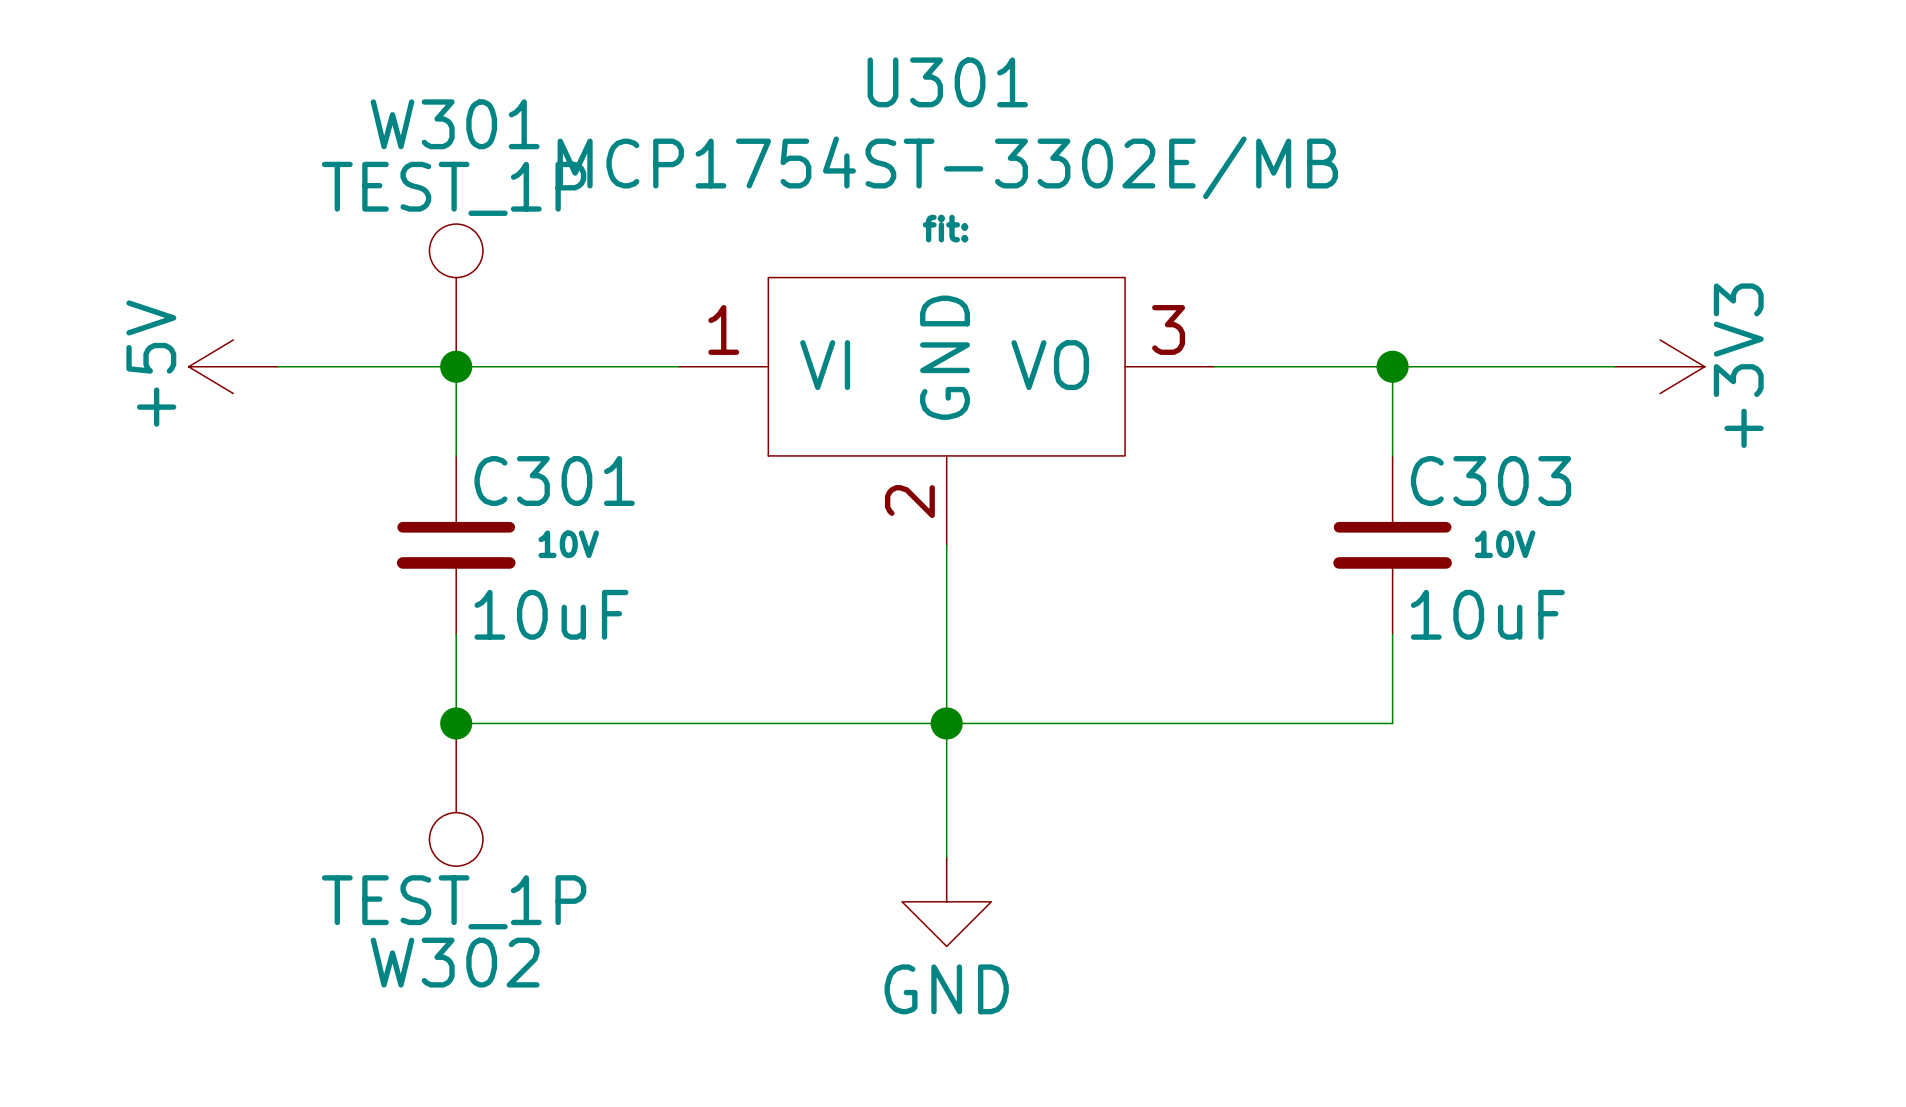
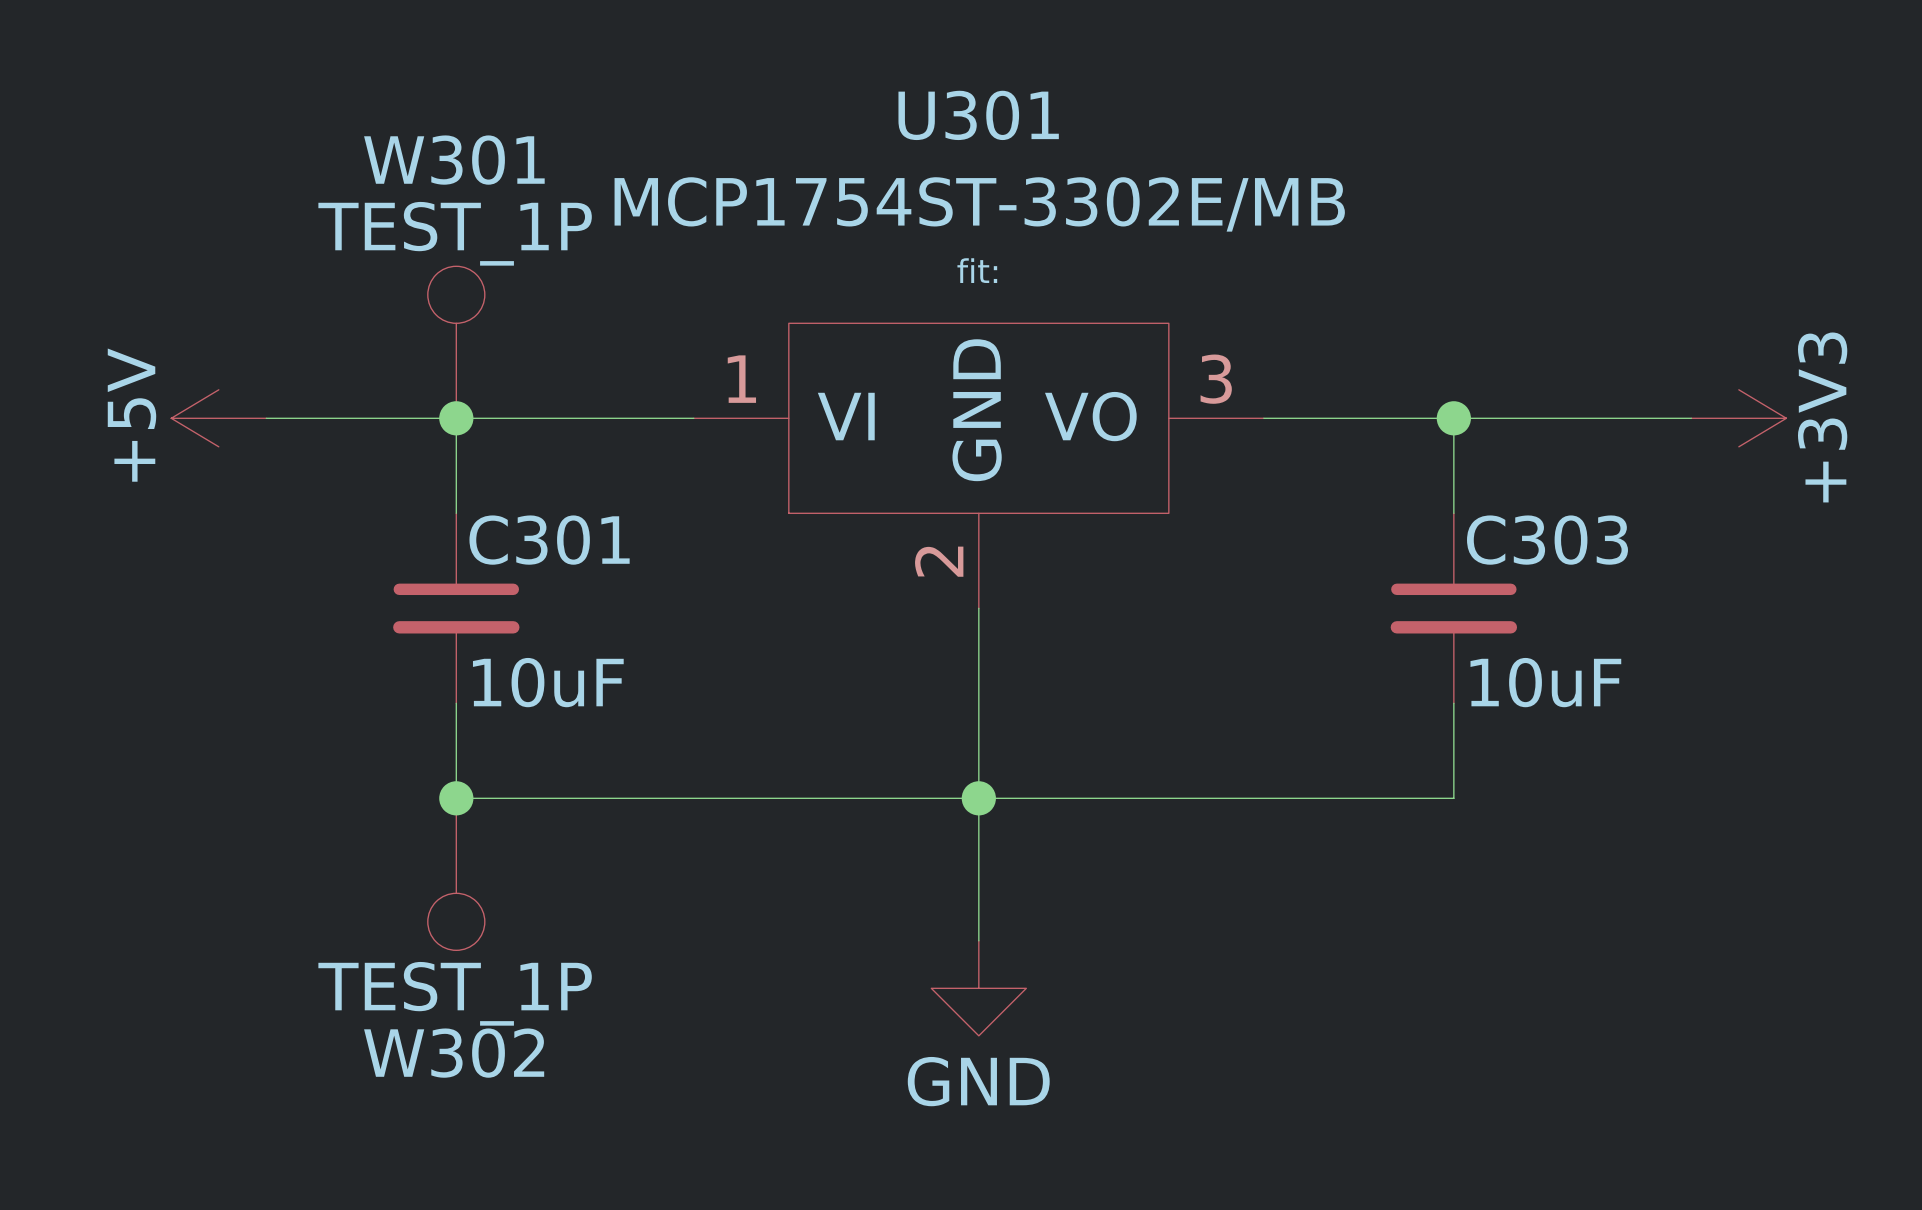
C301 text: 10V (568, 544) -> none
C303 text: 10V (1505, 544) -> none

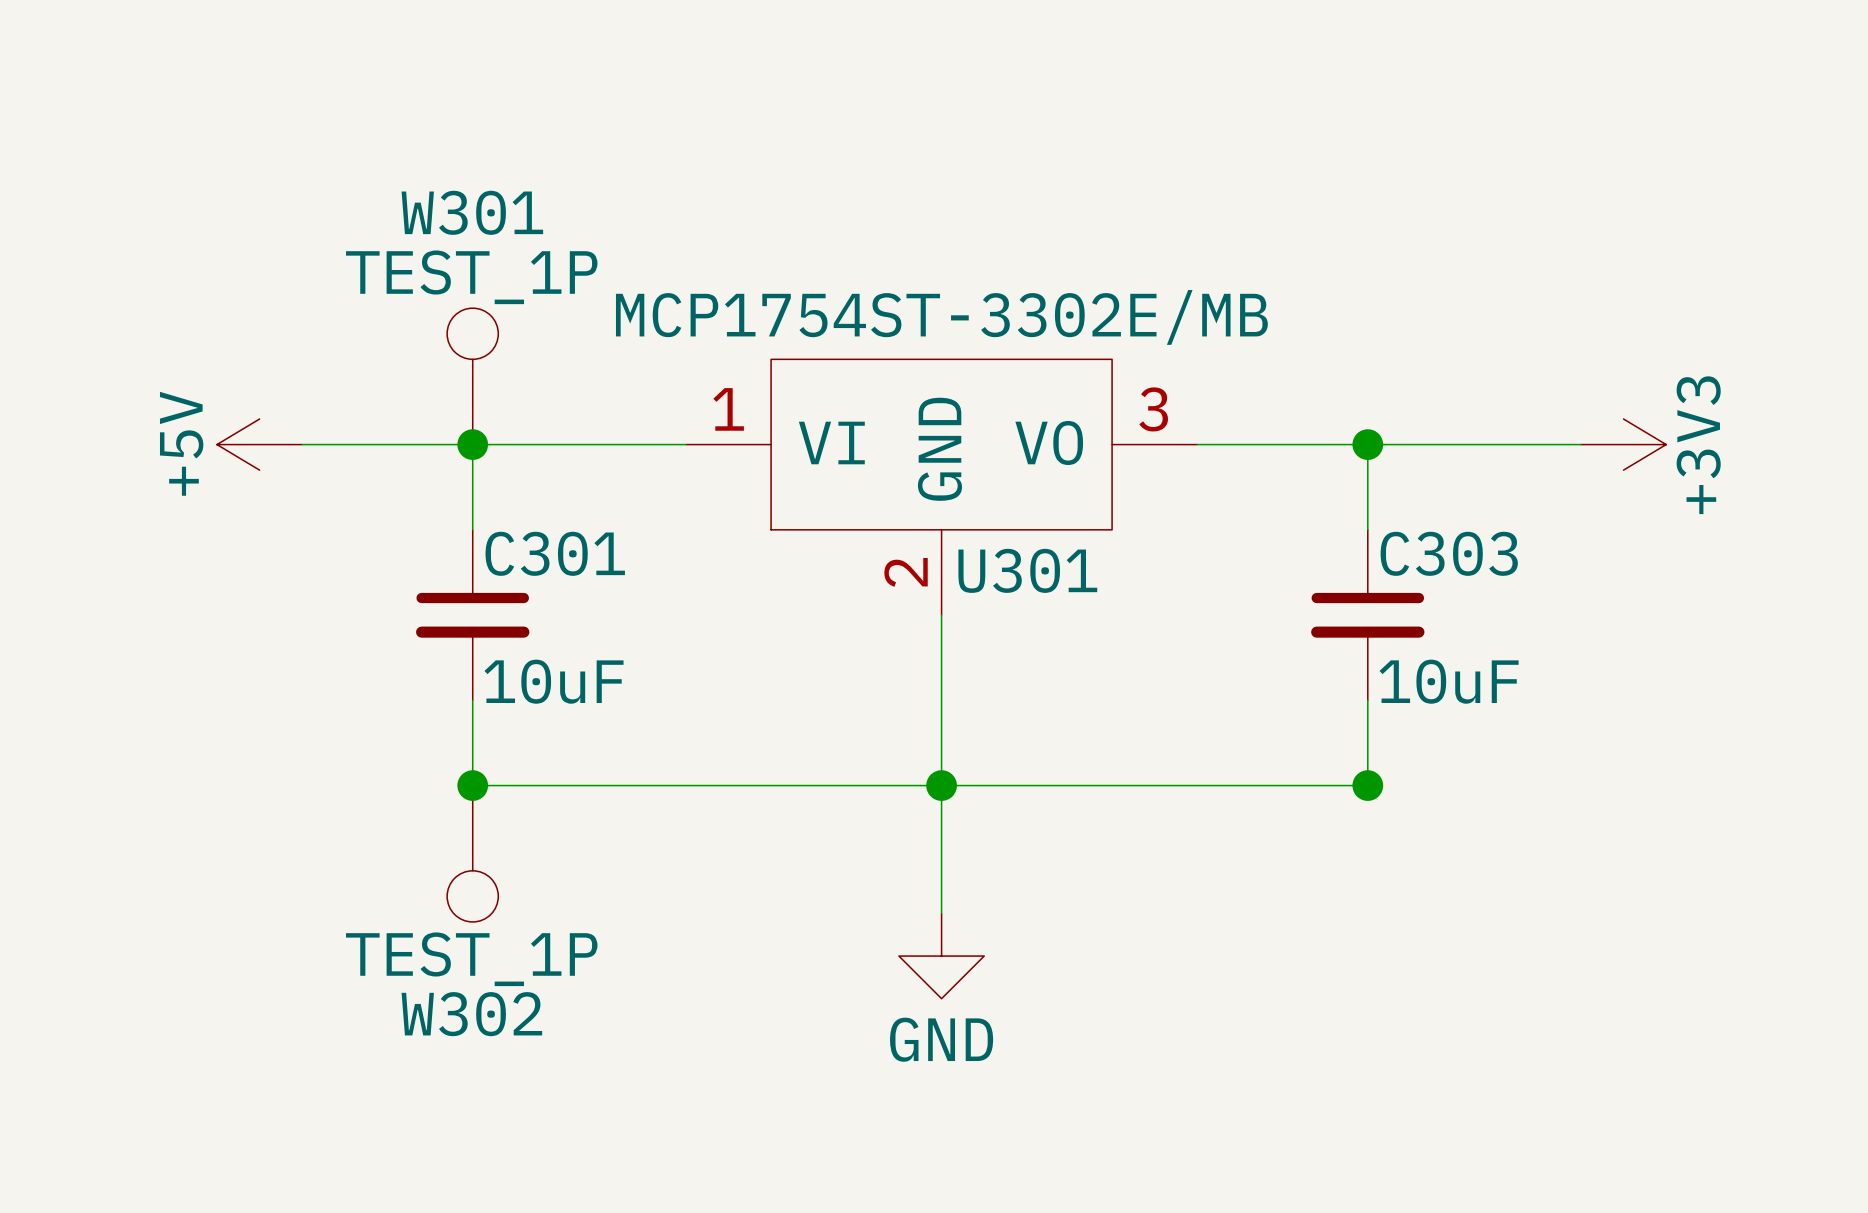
U301 name position: U301 (978, 115) -> U301 (1027, 570)
U301 value position: MCP1754ST-3302E/MB (979, 204) -> MCP1754ST-3302E/MB (941, 317)
U301 text: fit: (977, 270) -> none
junction: none -> (1367, 785)

